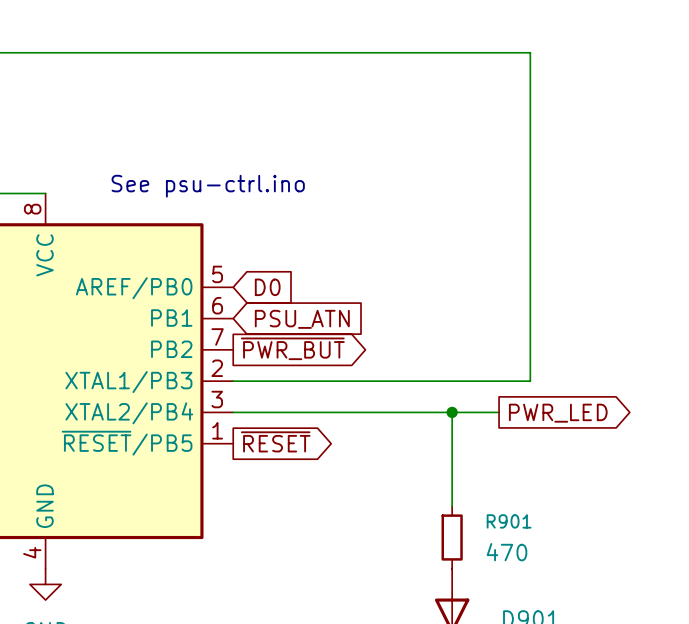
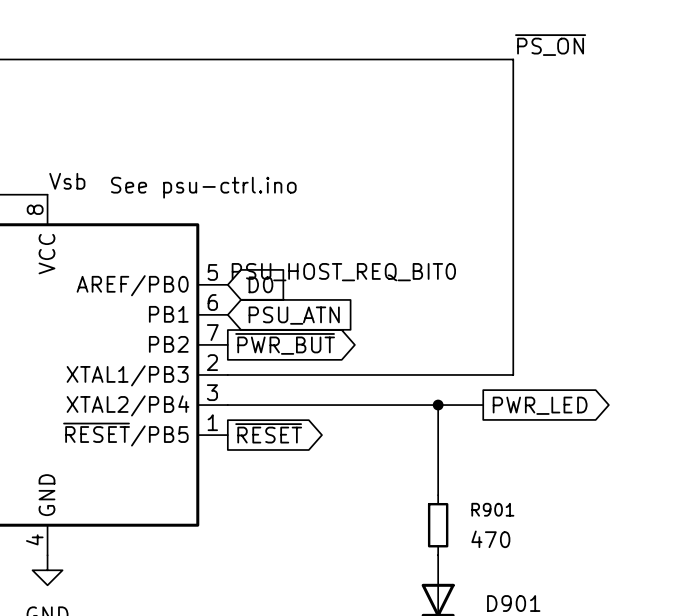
label: none -> ~{PS_ON} (550, 45)
label: none -> Vsb (67, 181)
label: none -> PSU_HOST_REQ_BIT0 (343, 272)

